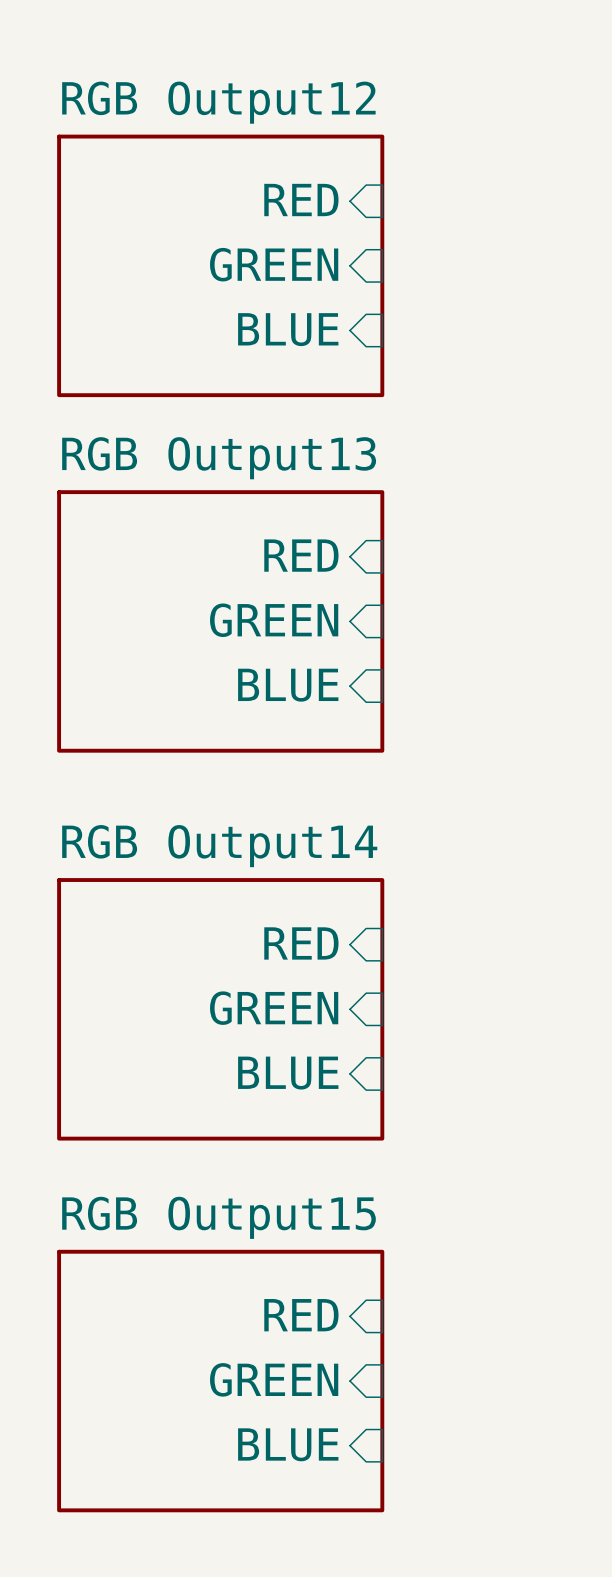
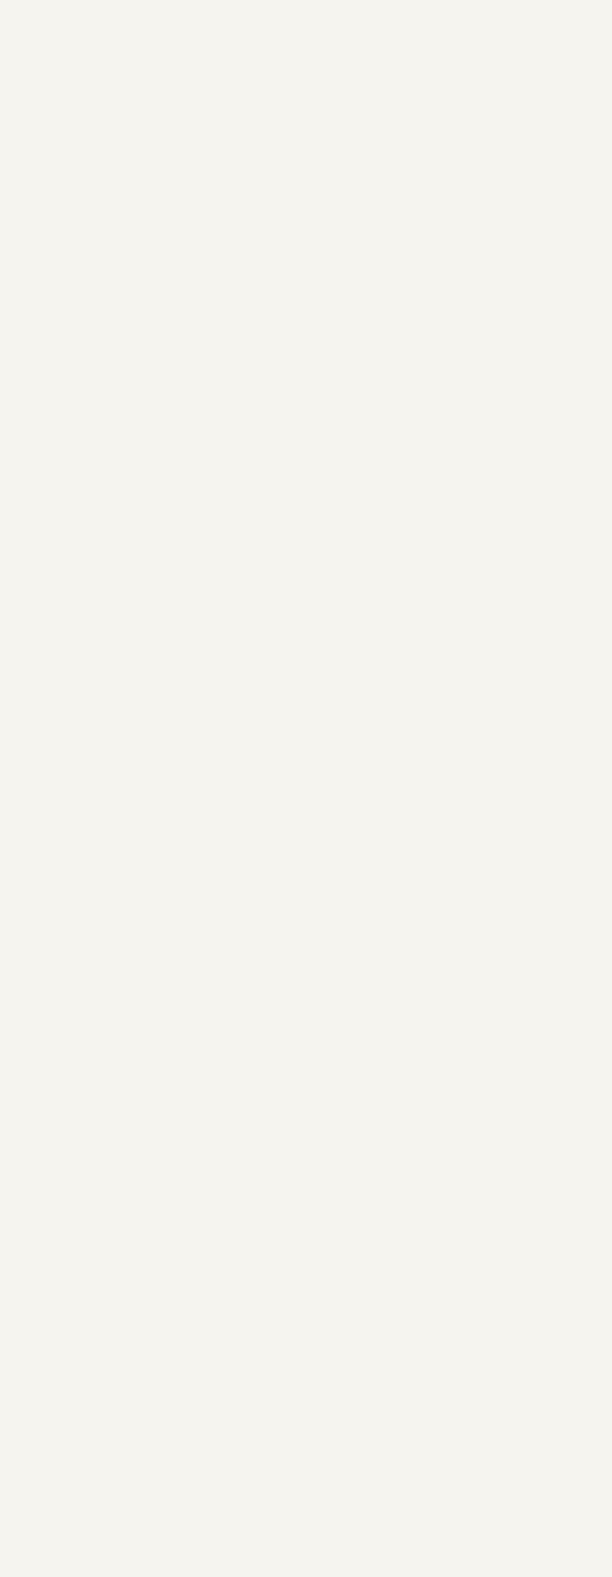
sheet pin: RED (301, 200) -> none
sheet pin: GREEN (274, 264) -> none
sheet RGB Output12: (220, 265) -> none
sheet pin: BLUE (288, 329) -> none
sheet pin: RED (301, 555) -> none
sheet pin: GREEN (274, 620) -> none
sheet RGB Output13: (220, 621) -> none
sheet pin: BLUE (288, 685) -> none
sheet pin: RED (301, 943) -> none
sheet pin: GREEN (274, 1008) -> none
sheet RGB Output14: (220, 1009) -> none
sheet pin: BLUE (288, 1073) -> none
sheet pin: RED (301, 1315) -> none
sheet pin: GREEN (274, 1379) -> none
sheet RGB Output15: (220, 1381) -> none
sheet pin: BLUE (288, 1444) -> none

